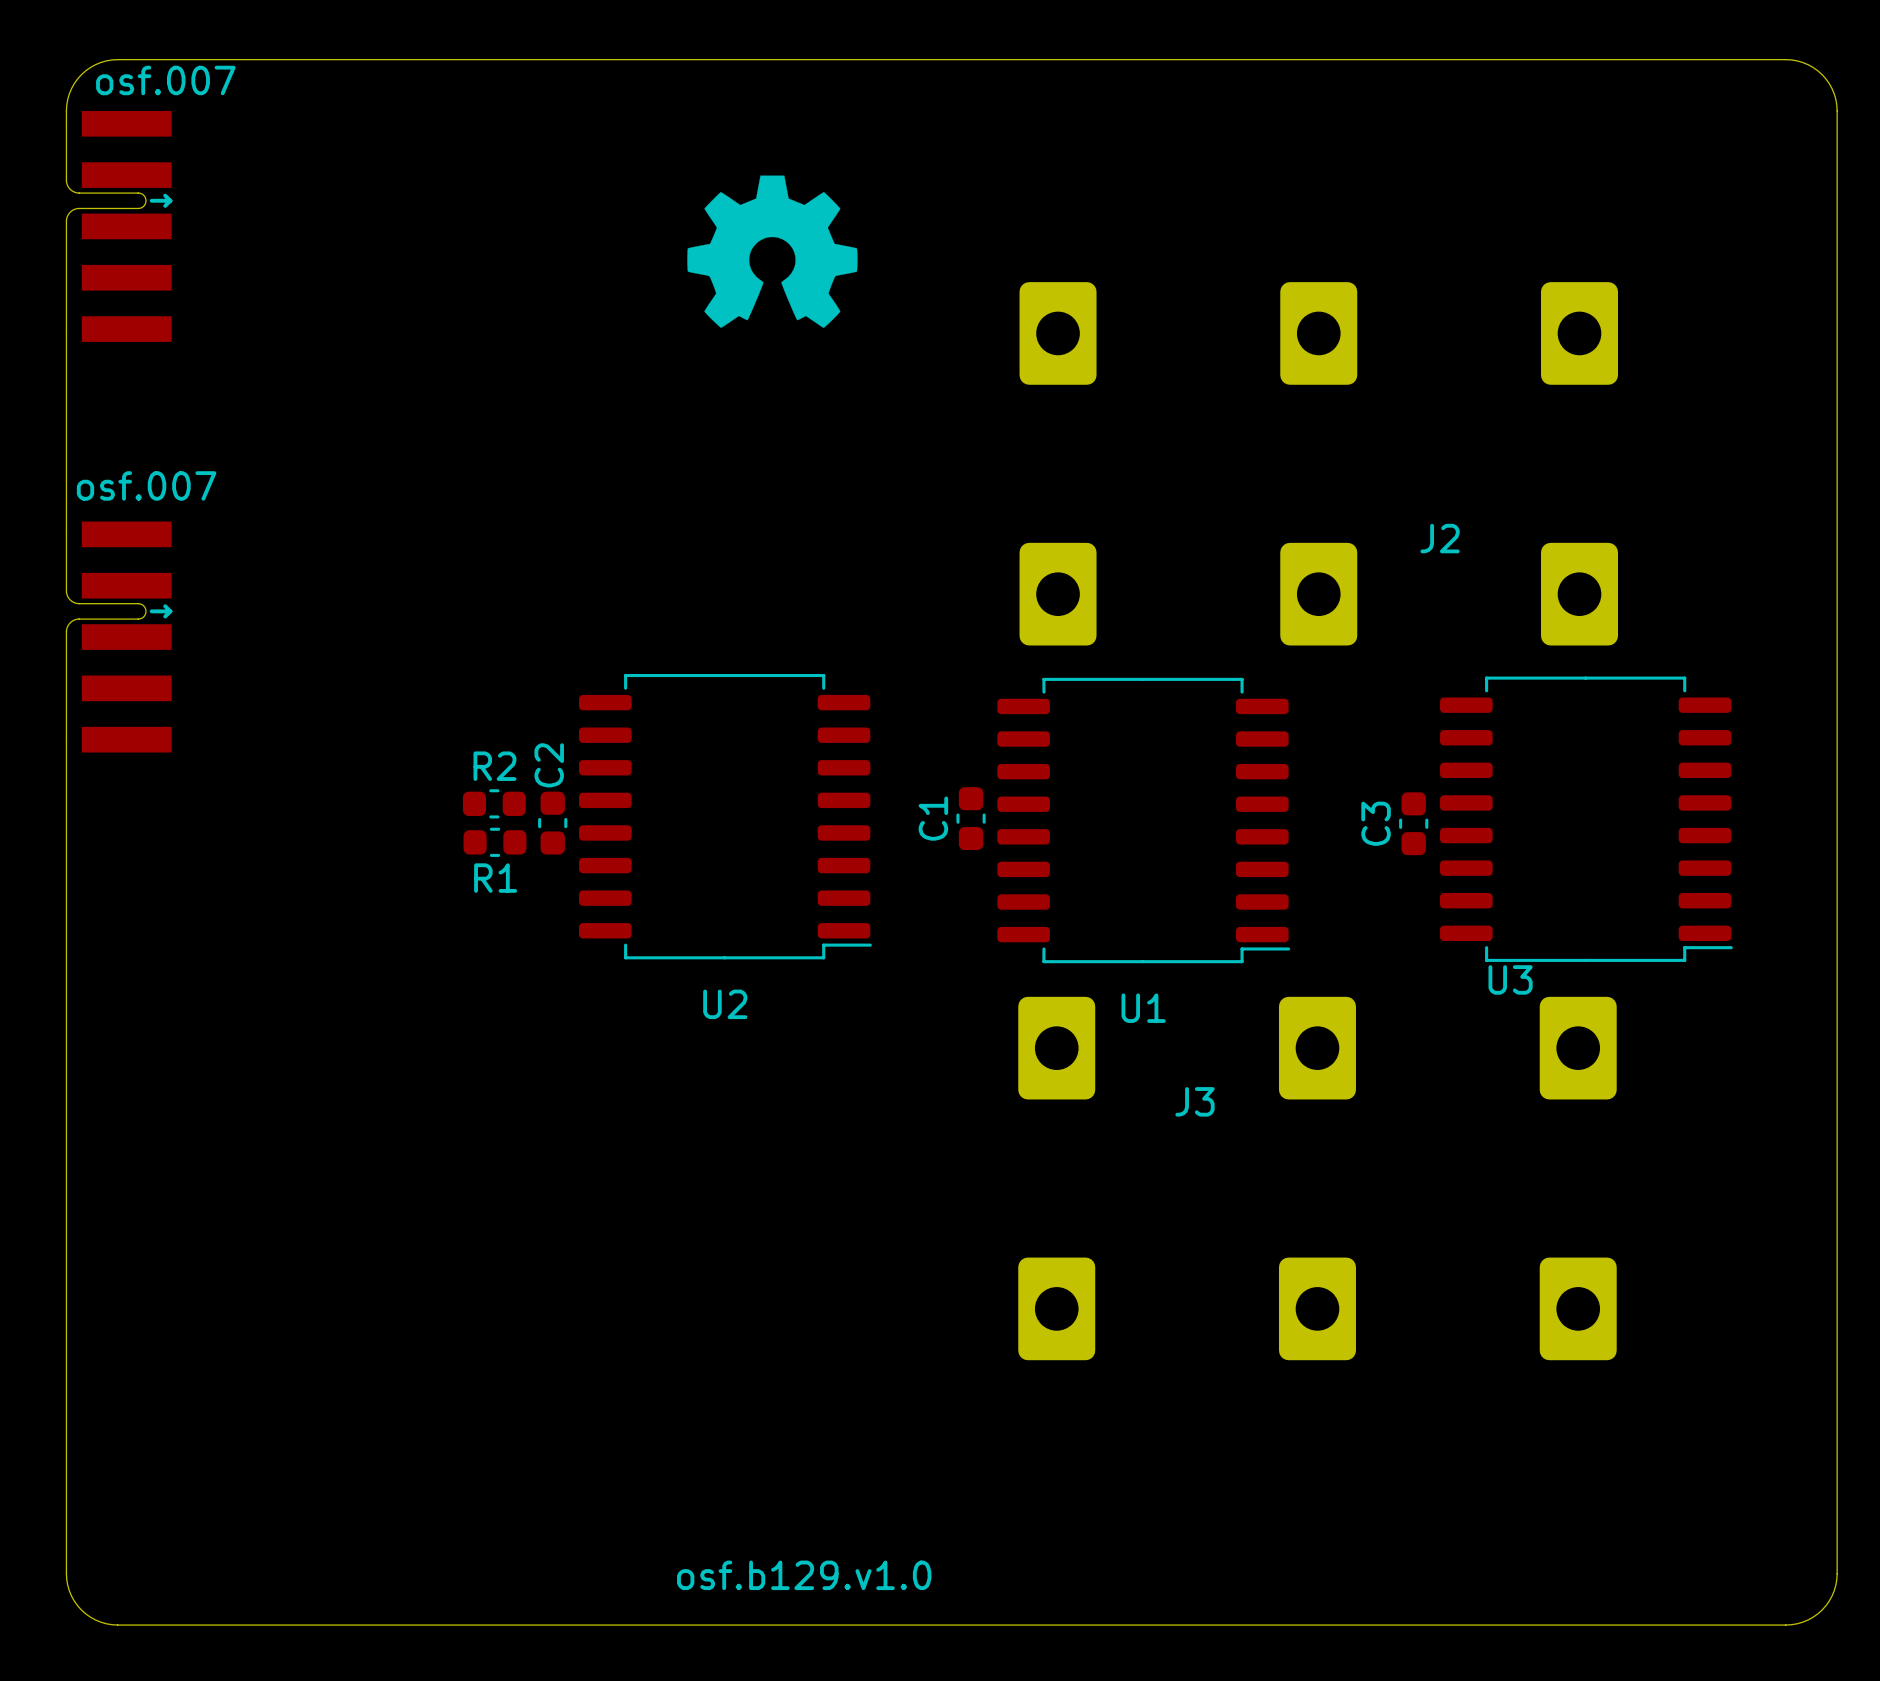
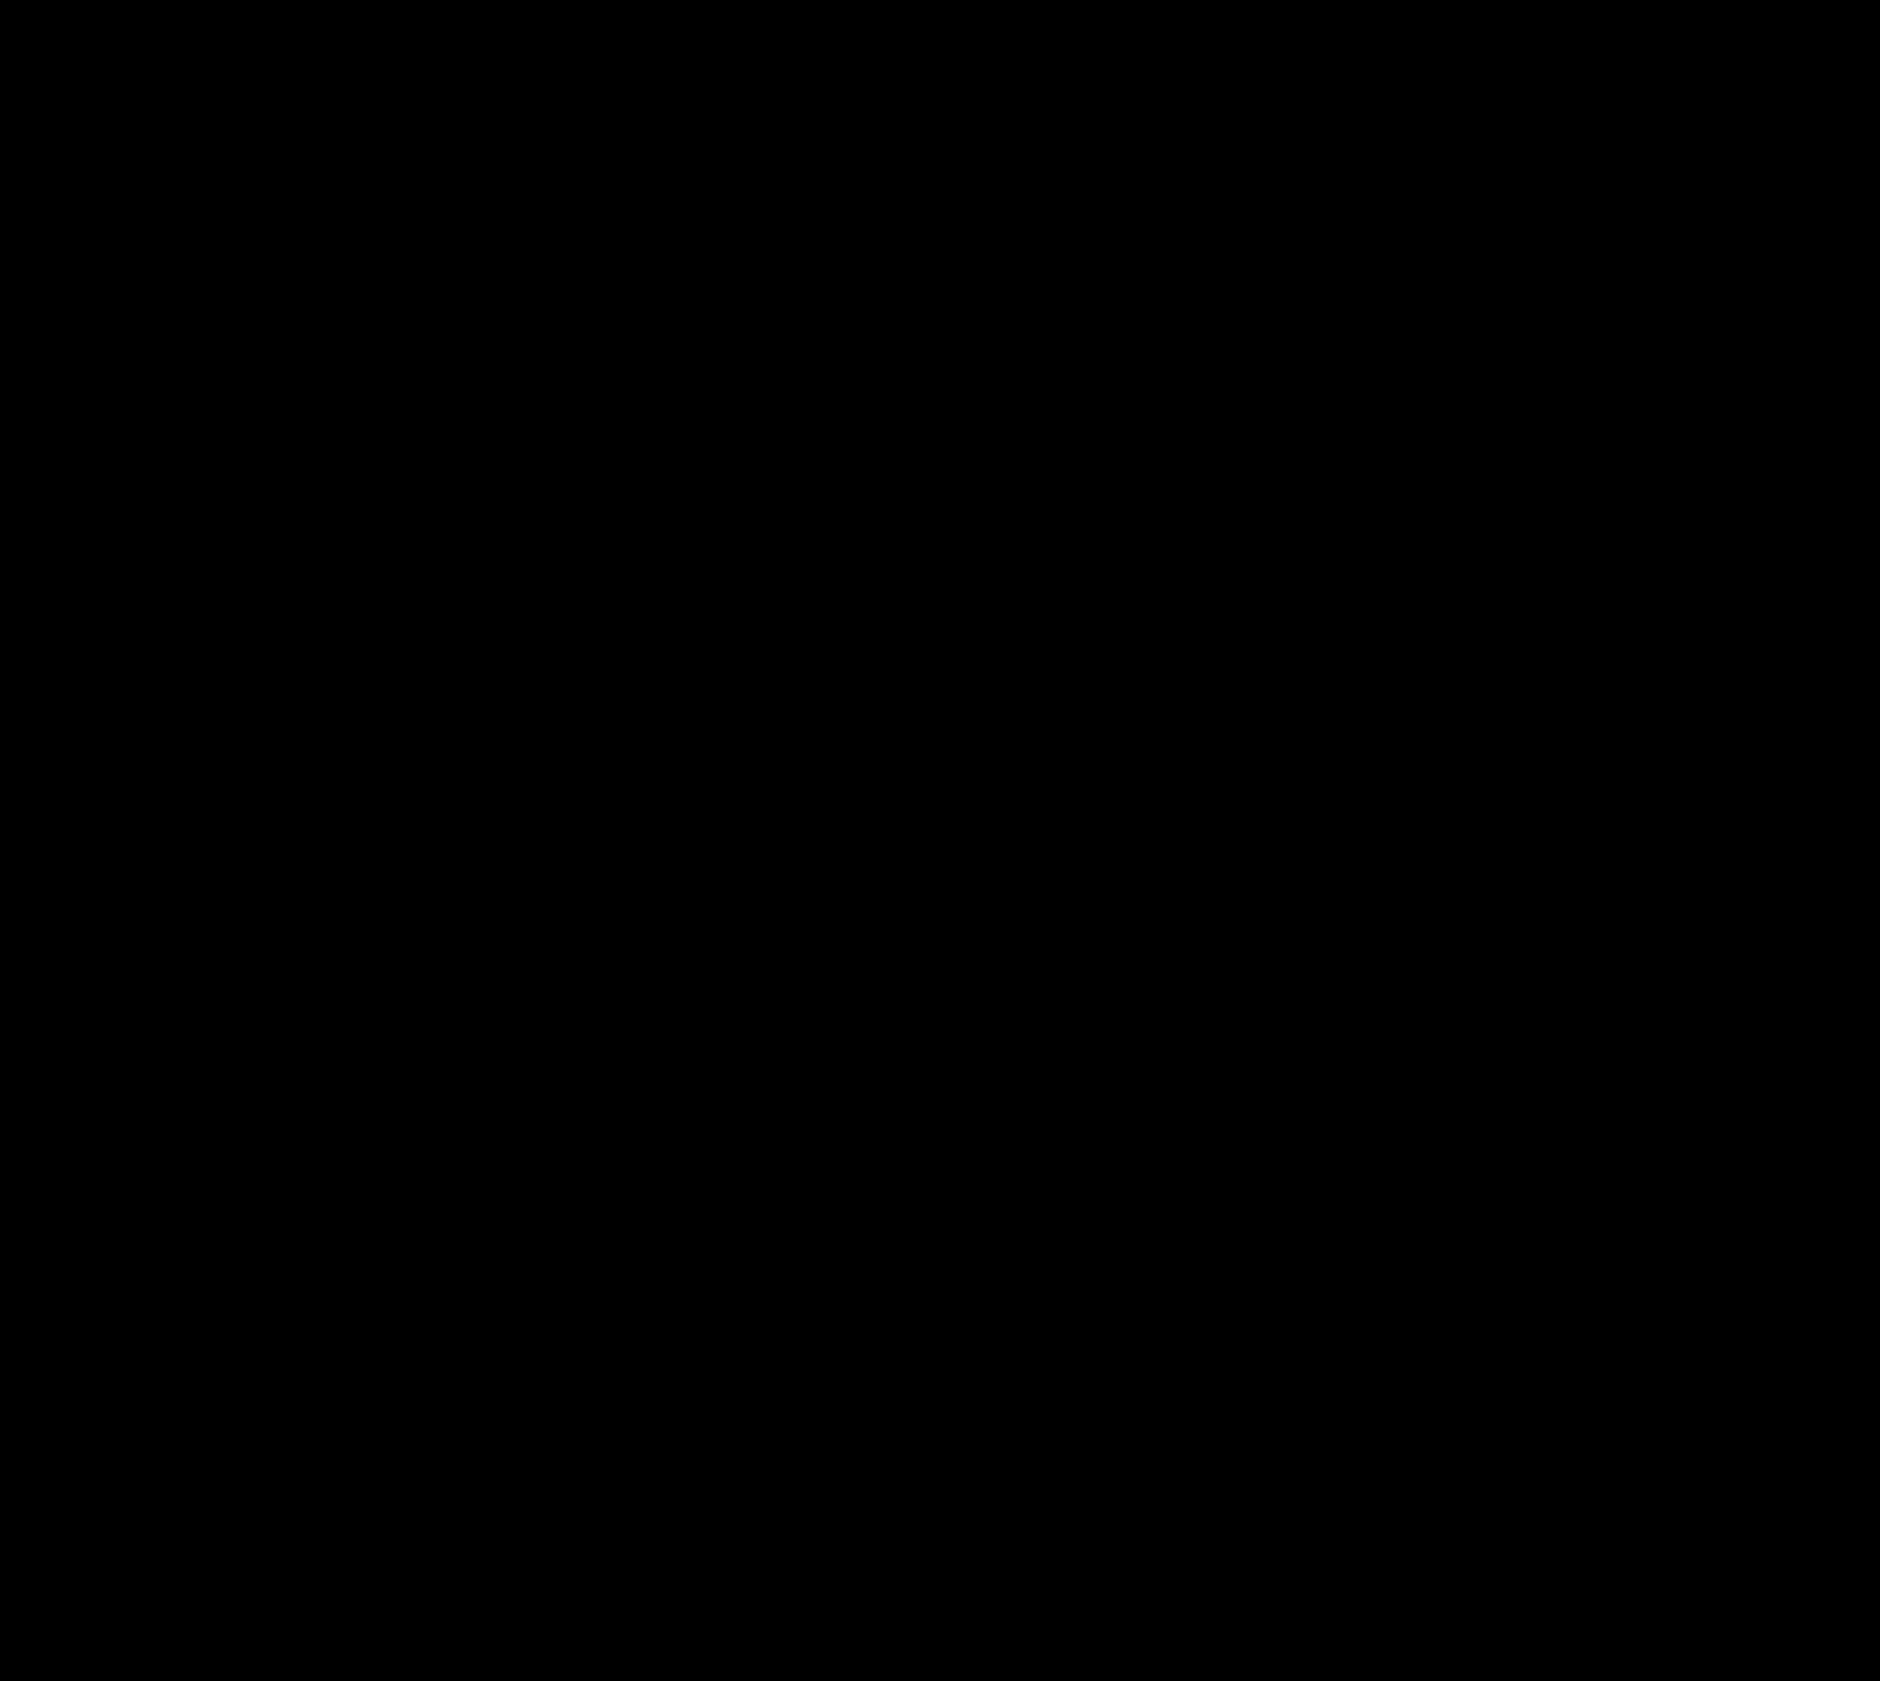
text: osf.007 (165, 80) -> none
board edge: (66, 123) (67, 99) (77, 78) (95, 64) (117, 59) (1785, 59) (1802, 62) (1817, 70) (1832, 88) (1837, 110) (1837, 1573) (1832, 1595) (1822, 1610) (1813, 1617) (1797, 1623) (1785, 1625) (117, 1625) (95, 1619) (81, 1610) (74, 1601) (67, 1585) (66, 1573) (66, 739) -> none
drawing: [687, 175, 858, 328] -> none
part: (119, 226) -> none
board edge: (66, 329) (66, 534) -> none
J2: (1318, 463) -> none
text: osf.007 (146, 485) -> none
part: (119, 637) -> none
R2: (494, 803) -> none
U2: (725, 816) -> none
C1: (971, 818) -> none
U3: (1586, 819) -> none
U1: (1143, 820) -> none
C2: (552, 823) -> none
C3: (1413, 823) -> none
R1: (494, 842) -> none
J3: (1317, 1178) -> none
text: osf.b129.v1.0 (804, 1575) -> none

